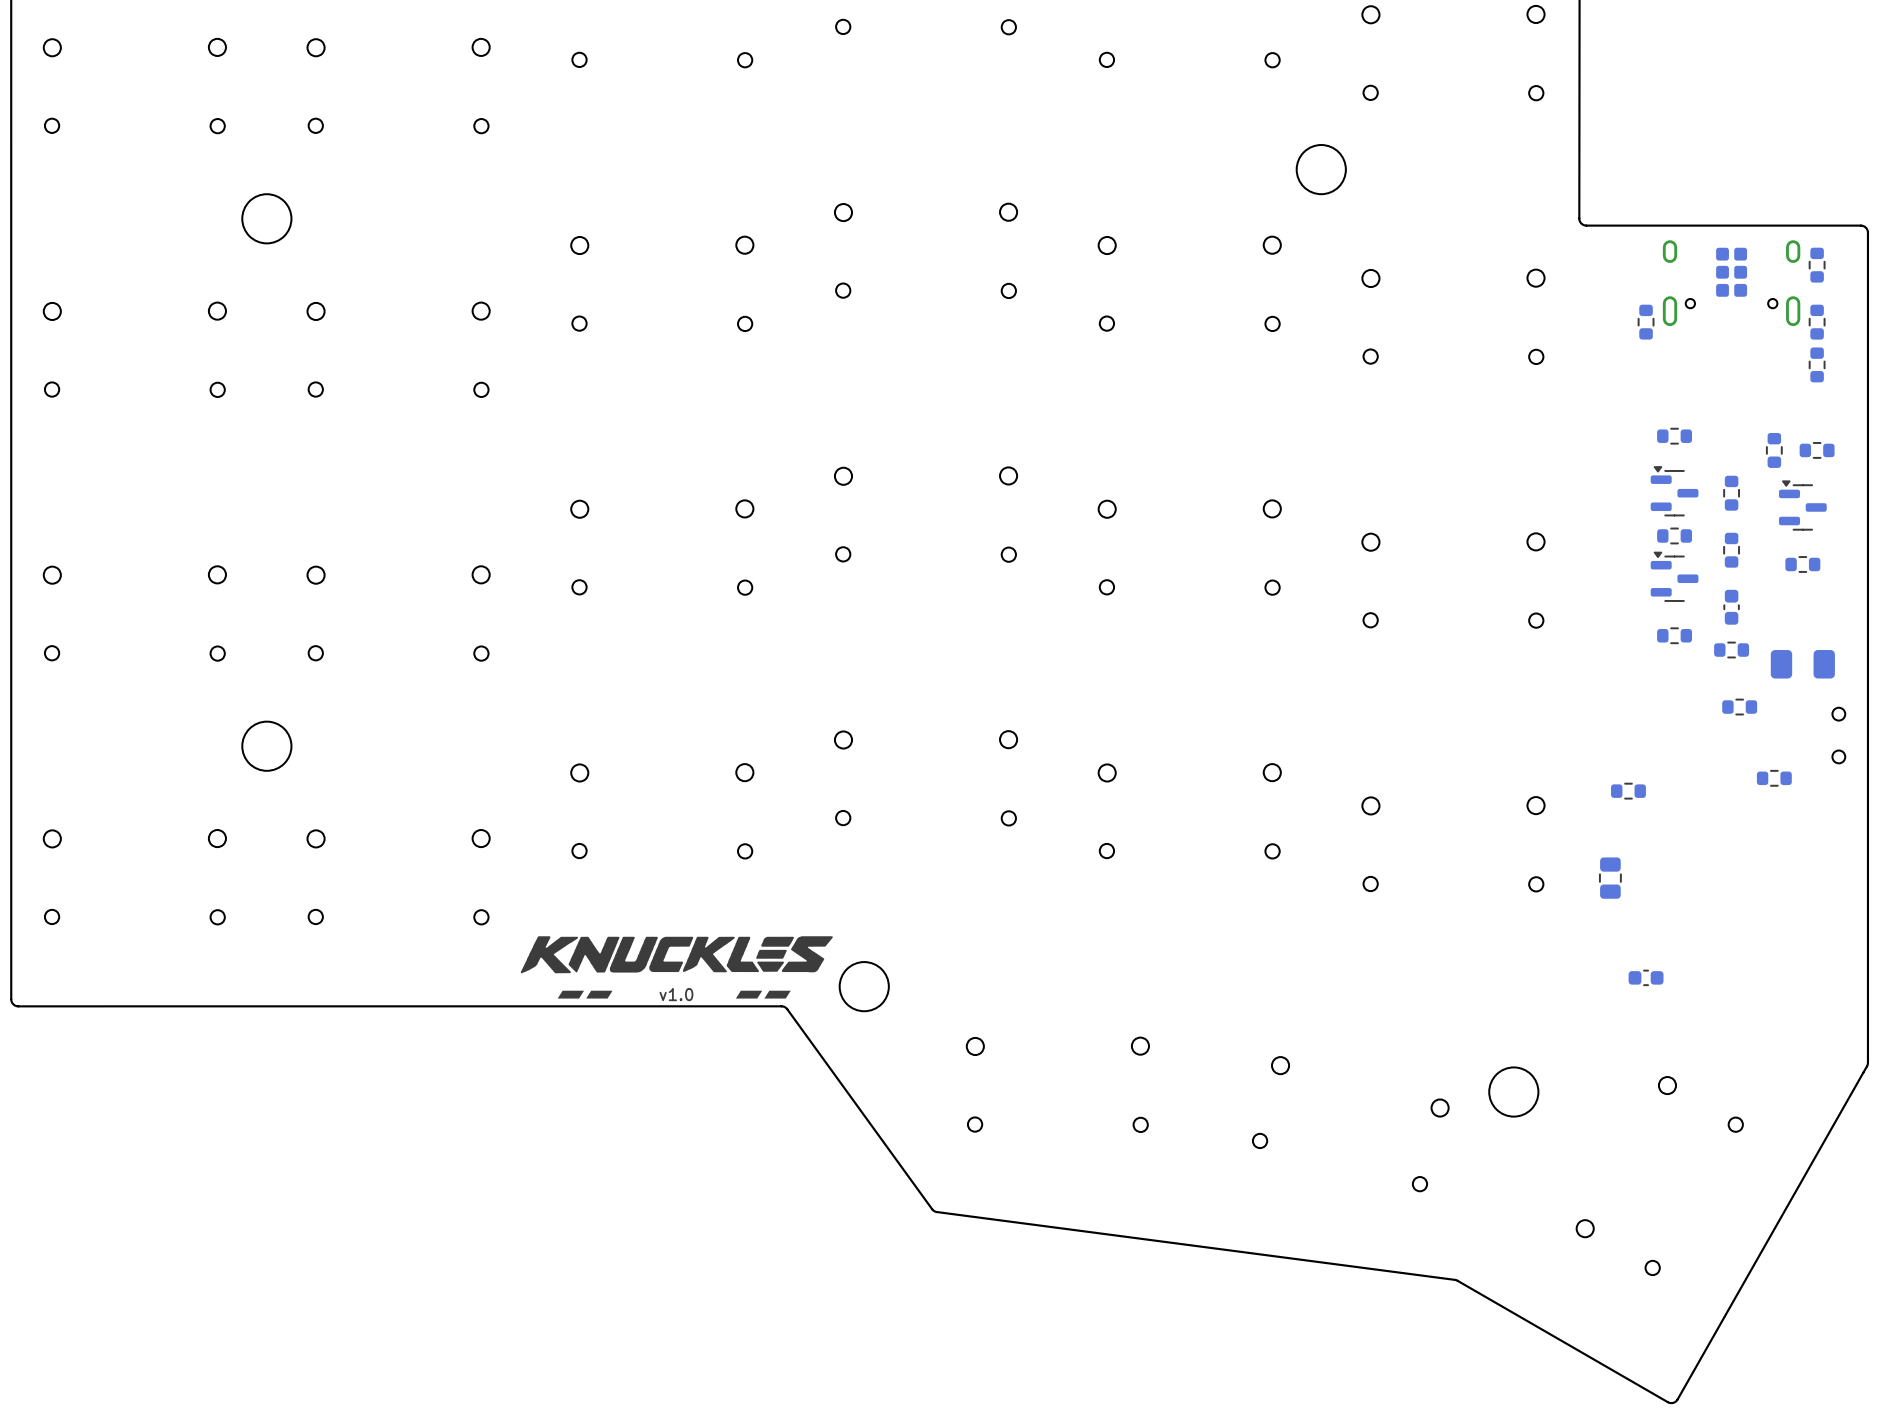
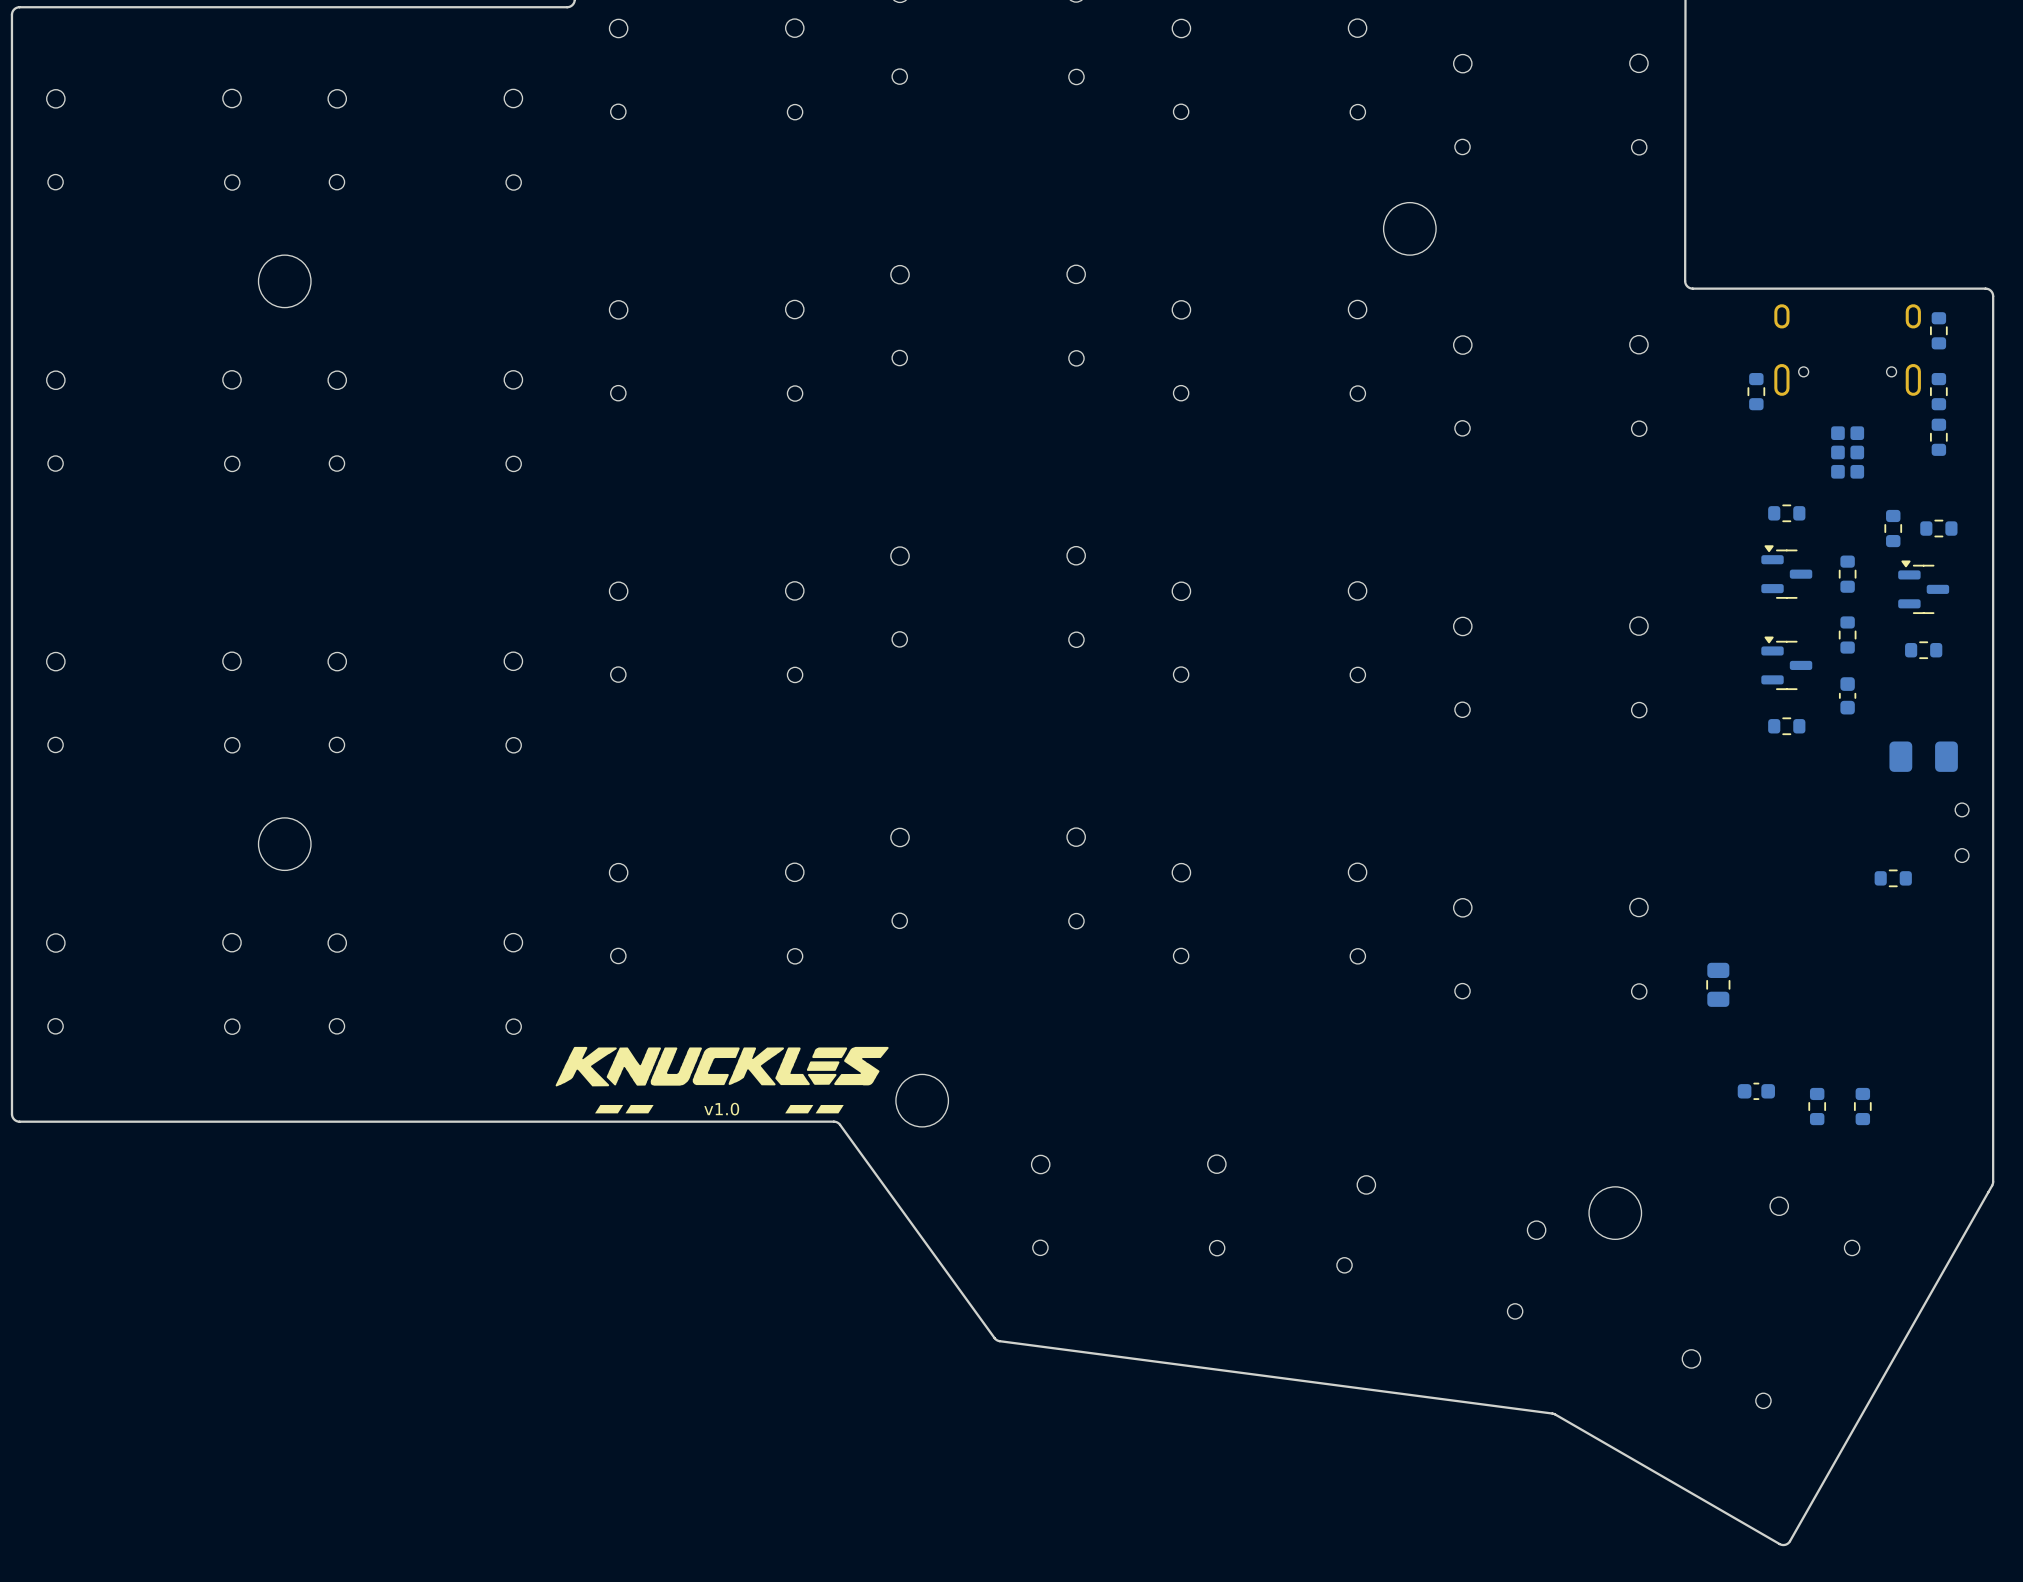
part position: (1731, 272) -> (1847, 452)
part: (1674, 535) -> none
part: (1731, 650) -> none
part: (1739, 707) -> none
part: (1628, 791) -> none
part: none -> (1817, 1106)
part: none -> (1862, 1106)

